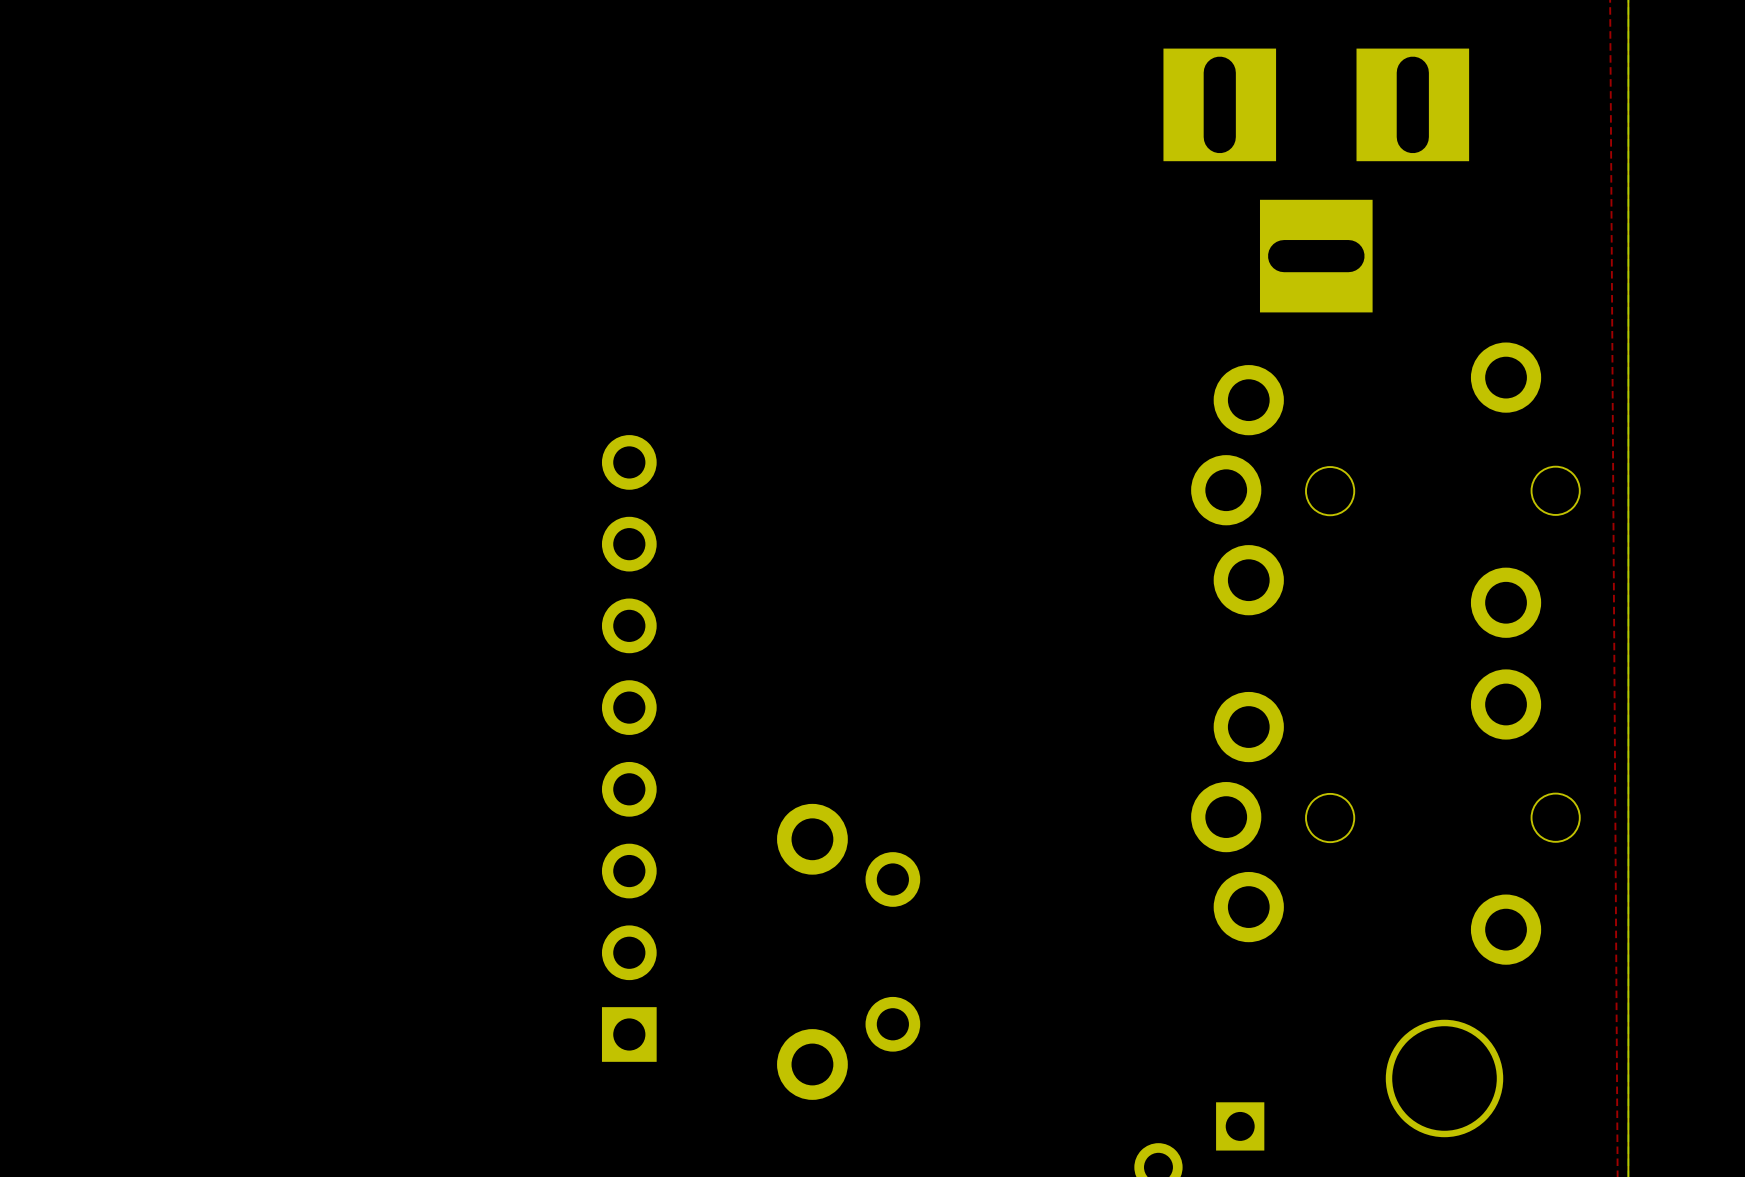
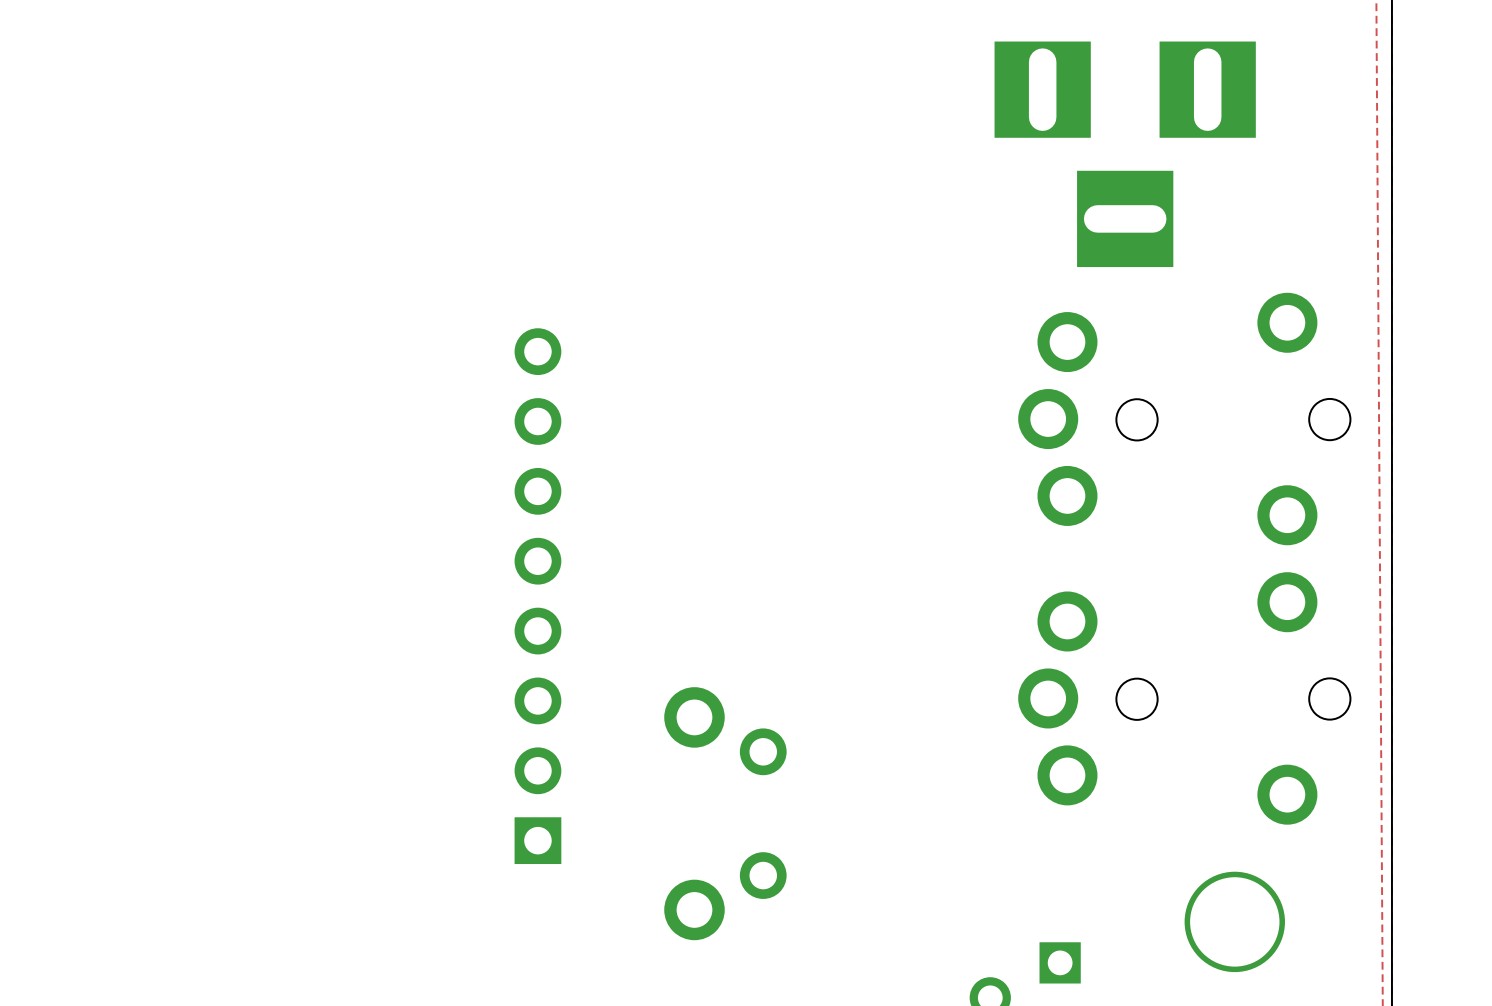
part position: (629, 748) -> (537, 596)

